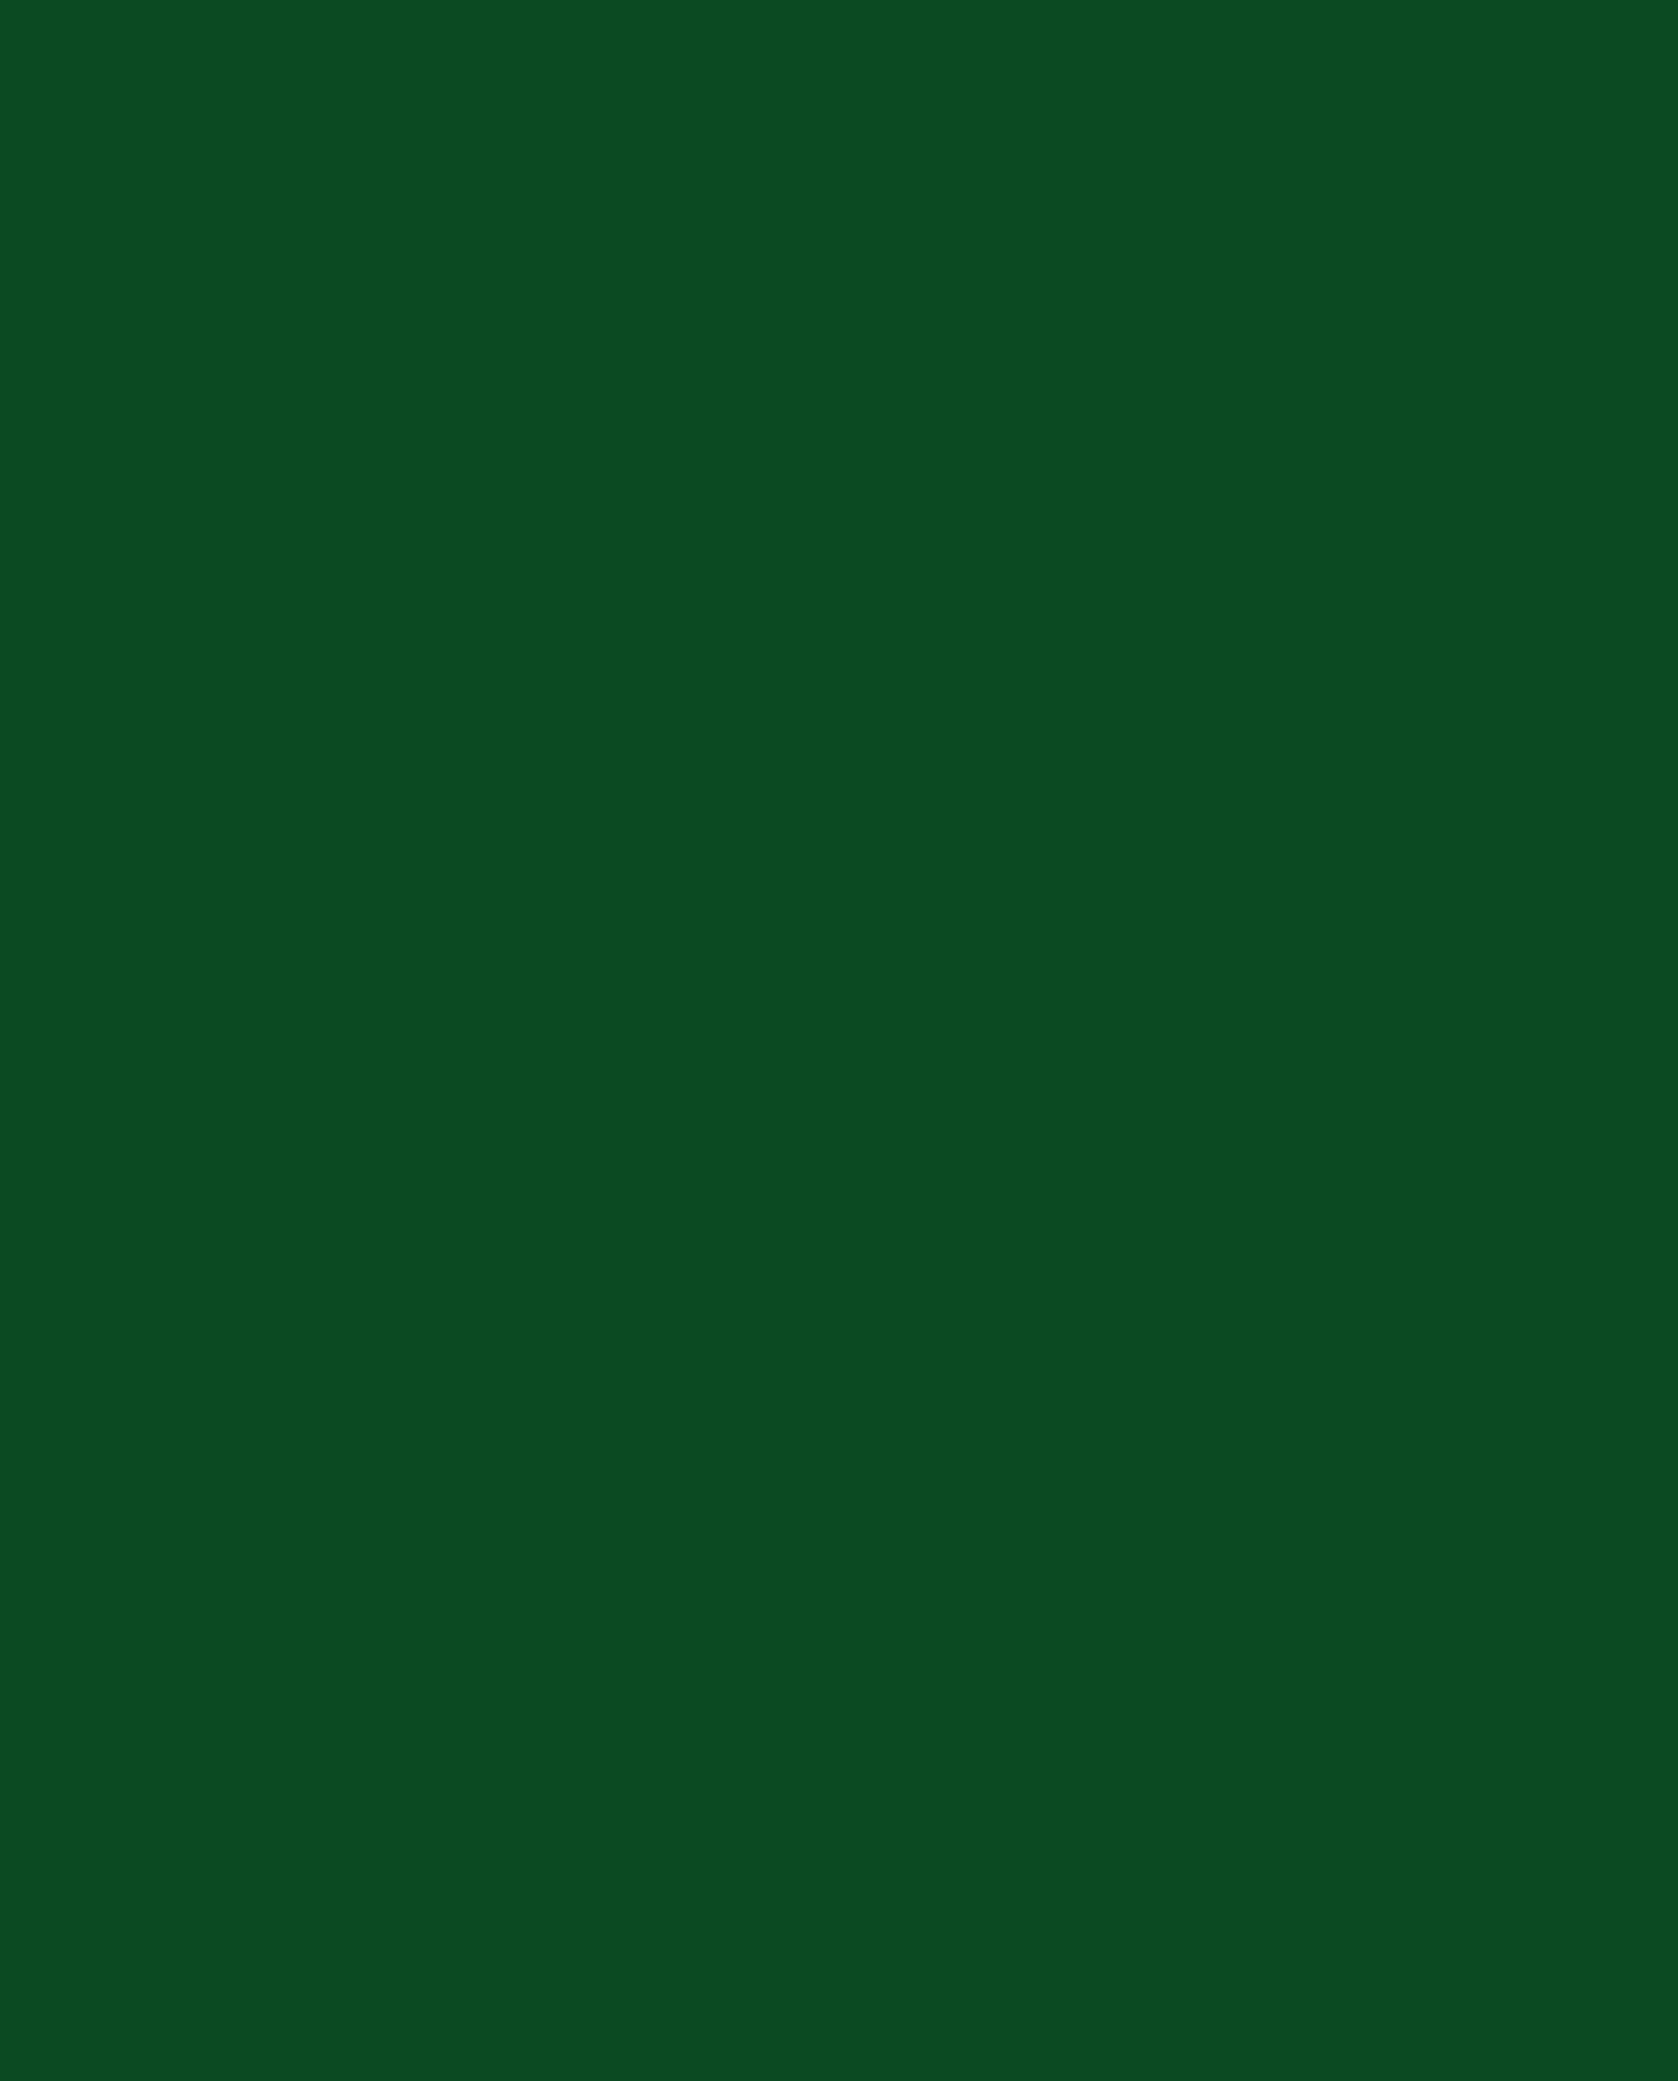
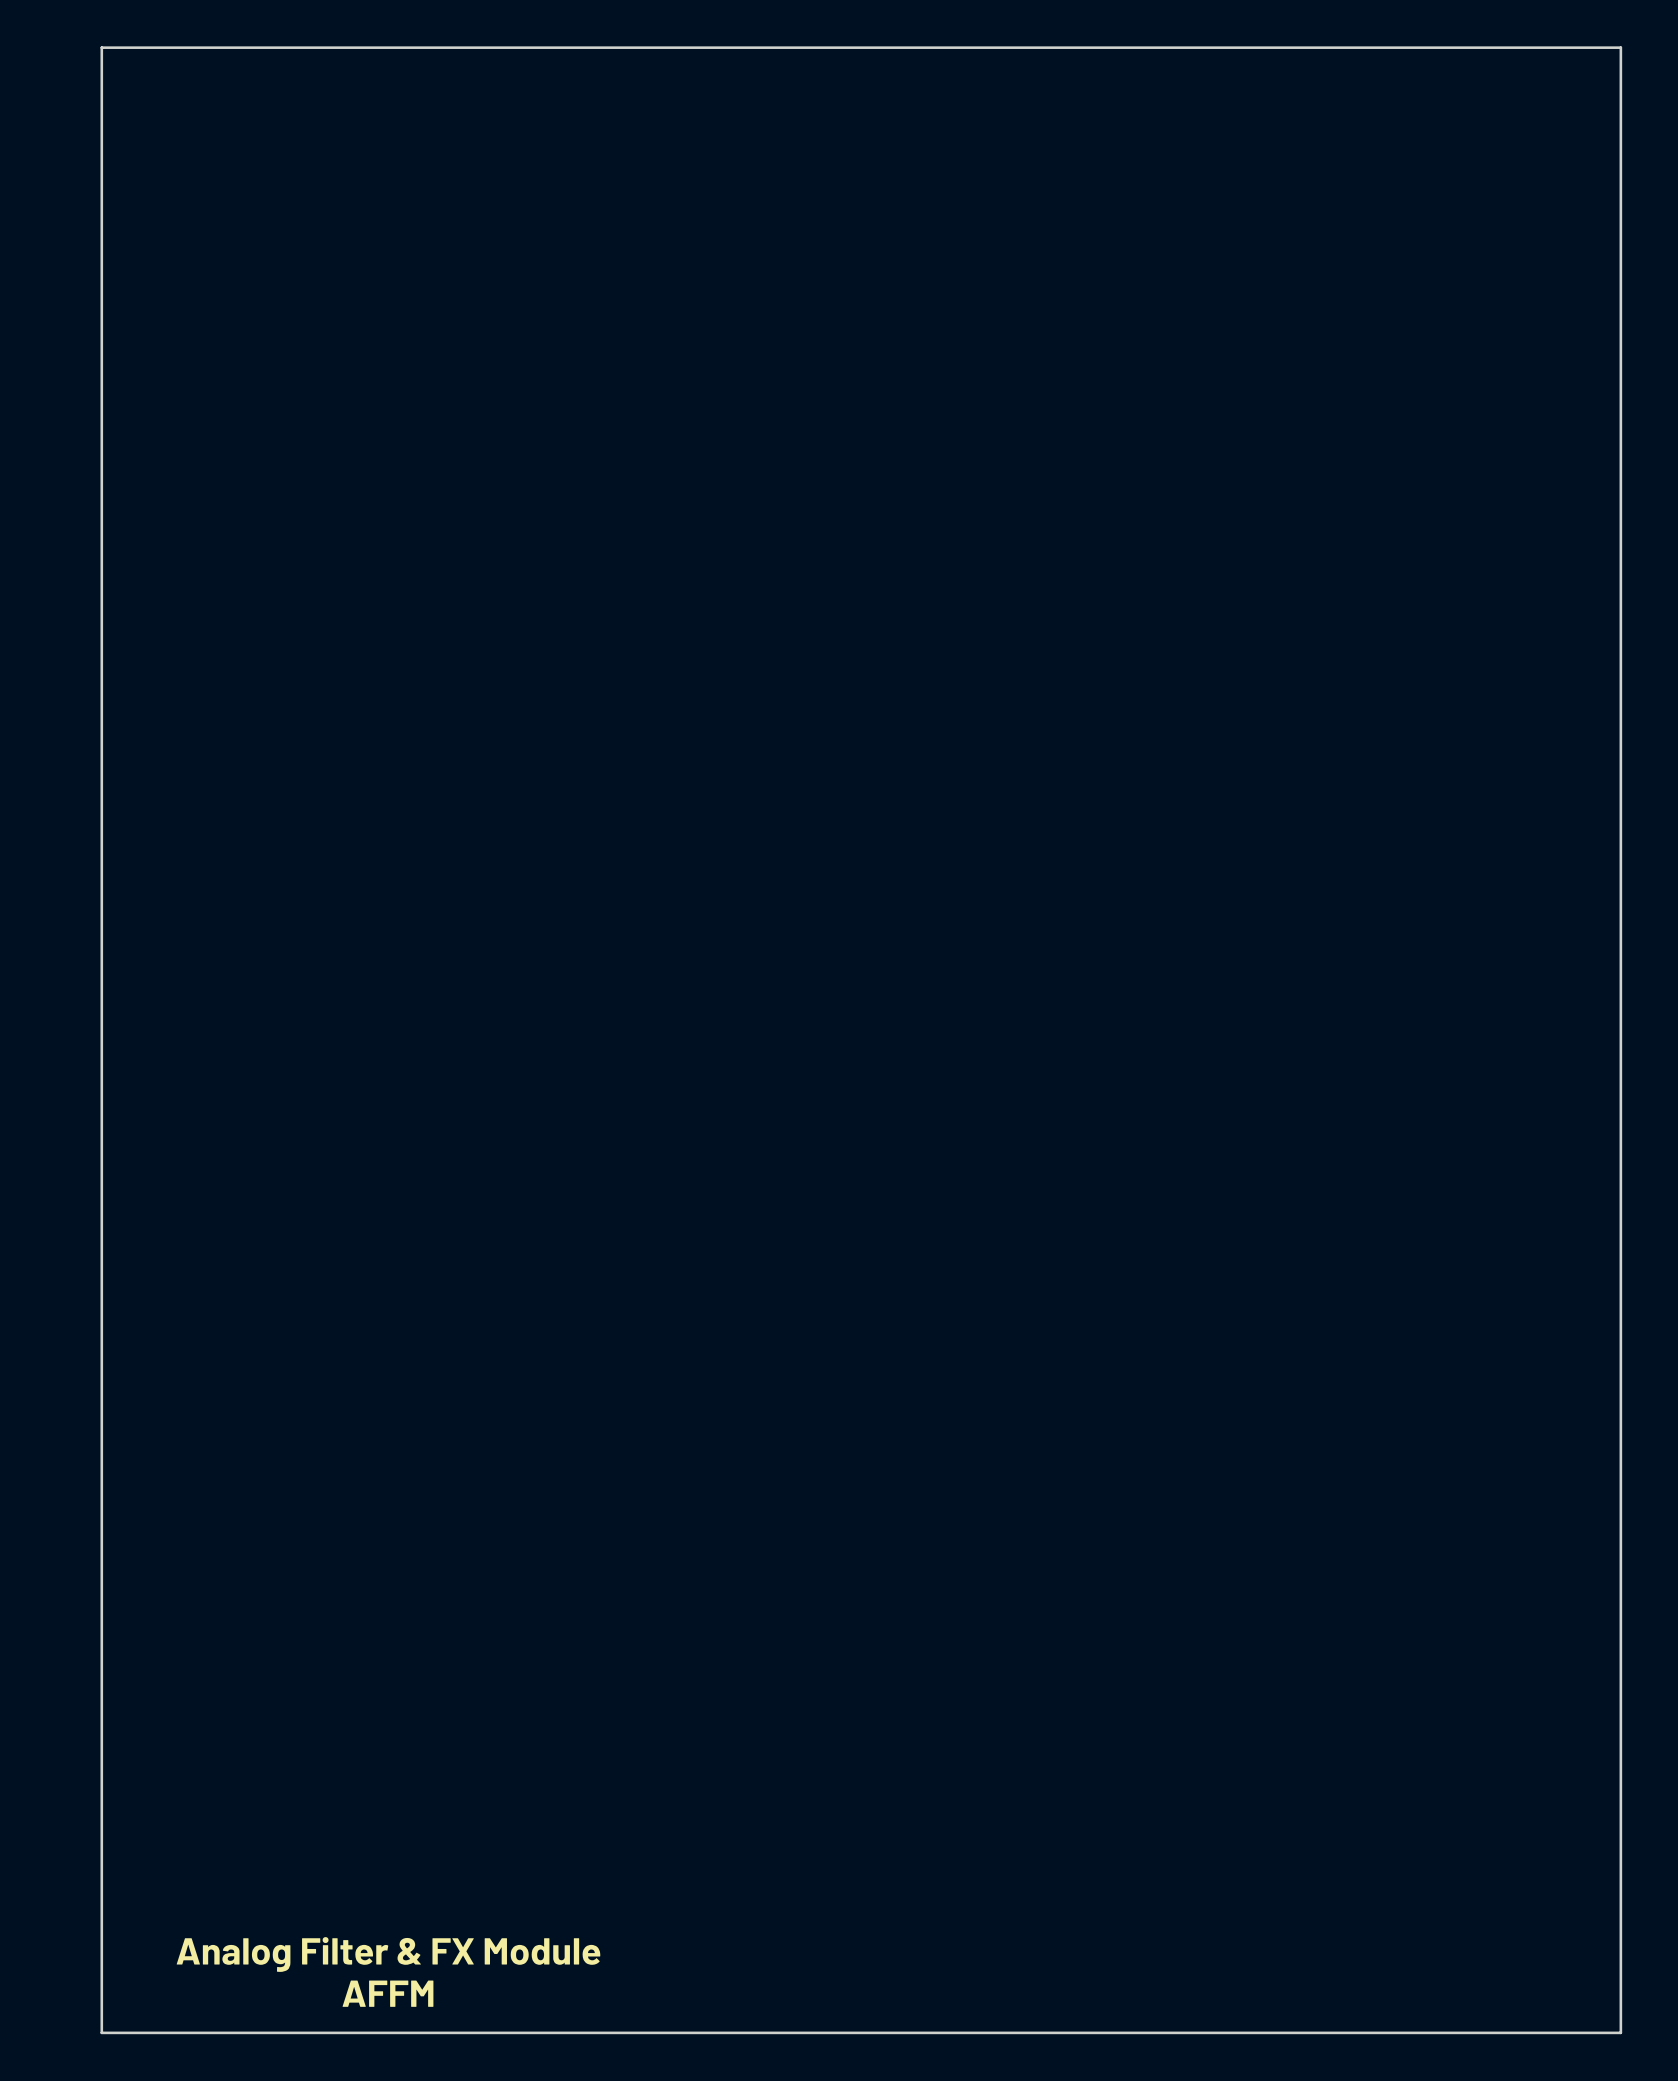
board edge: none -> (101, 47) (1620, 47) (1620, 2032) (101, 2032) (101, 47)
text: none -> Analog Filter & FX Module (388, 1954)
text: none -> AFFM (387, 1993)

